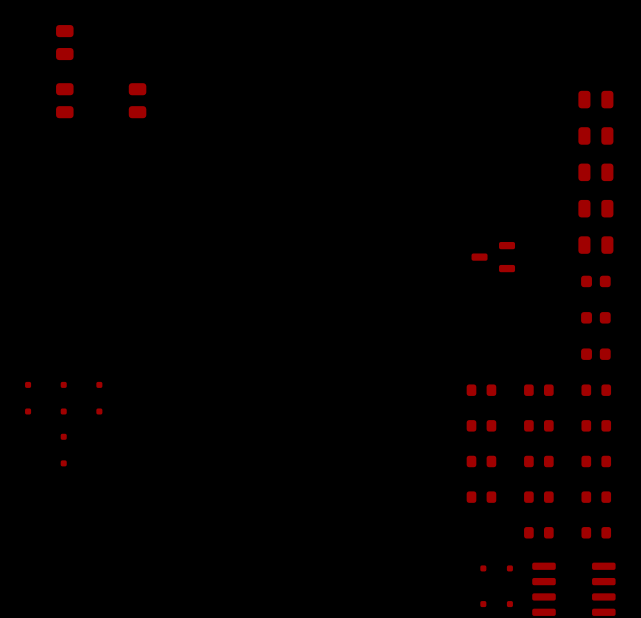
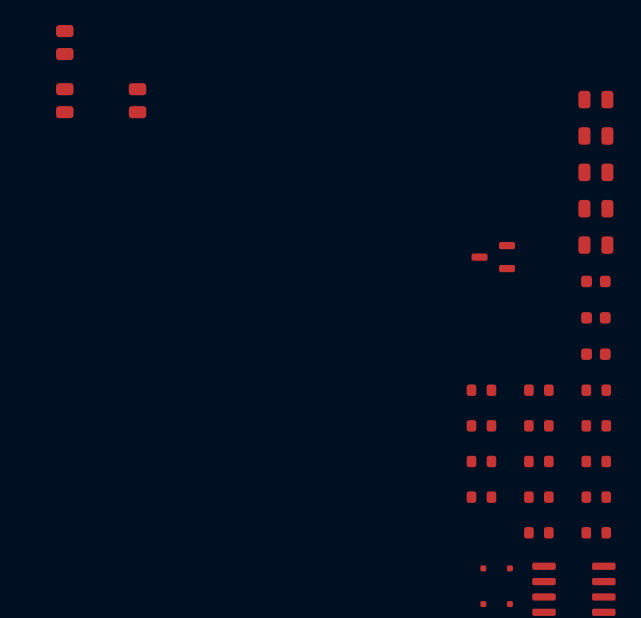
part: (28, 398) -> none
part: (63, 398) -> none
part: (99, 398) -> none
part: (63, 450) -> none

